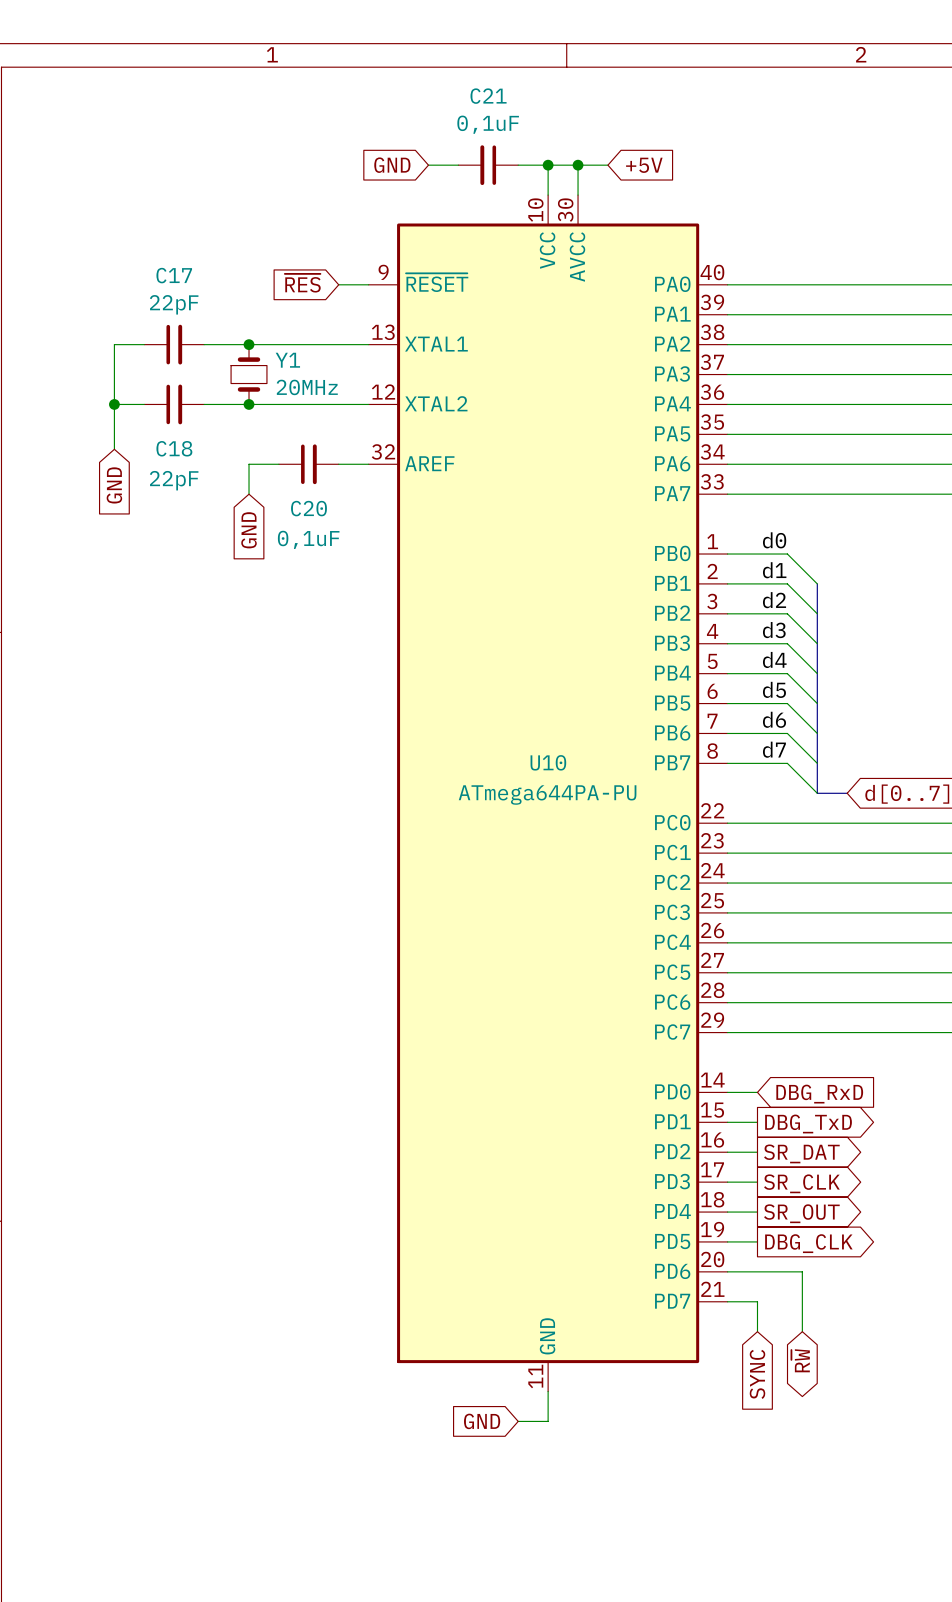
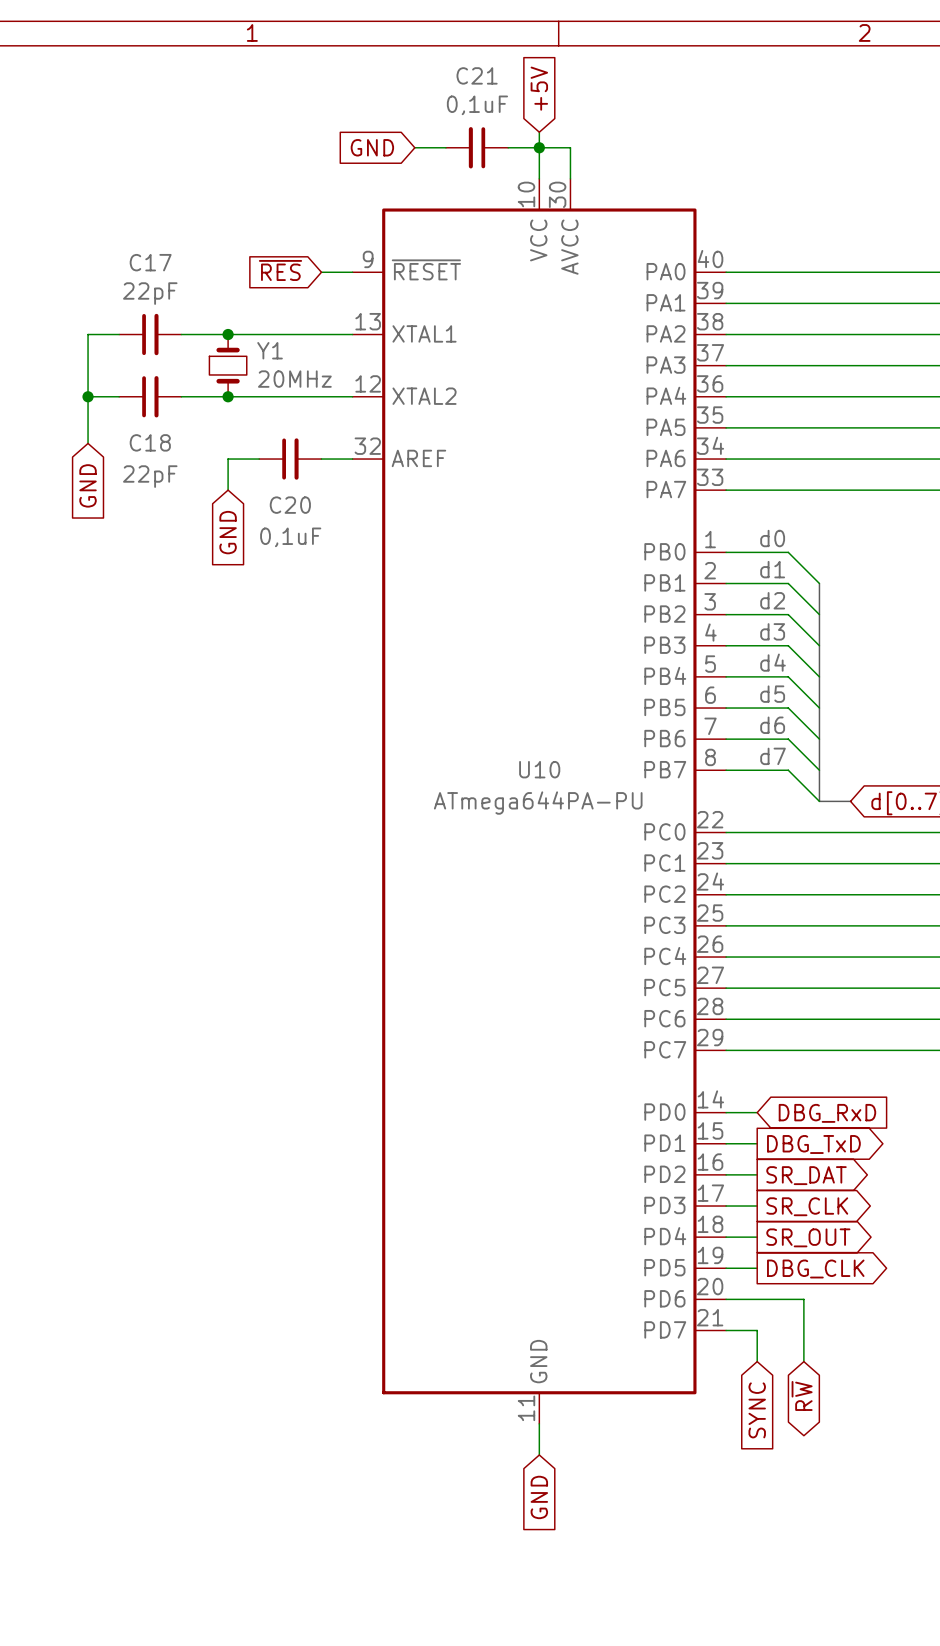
wire: none -> (539, 132) (539, 147)
wire: (578, 165) (607, 165) -> none
junction: (578, 165) -> none
global label rotation: 0° (644, 165) -> 90° counterclockwise (539, 88)
global label position: +5V (644, 165) -> +5V (539, 88)
global label rotation: 0° (482, 1421) -> 90° counterclockwise (539, 1497)
wire: (518, 1421) (548, 1421) -> none

